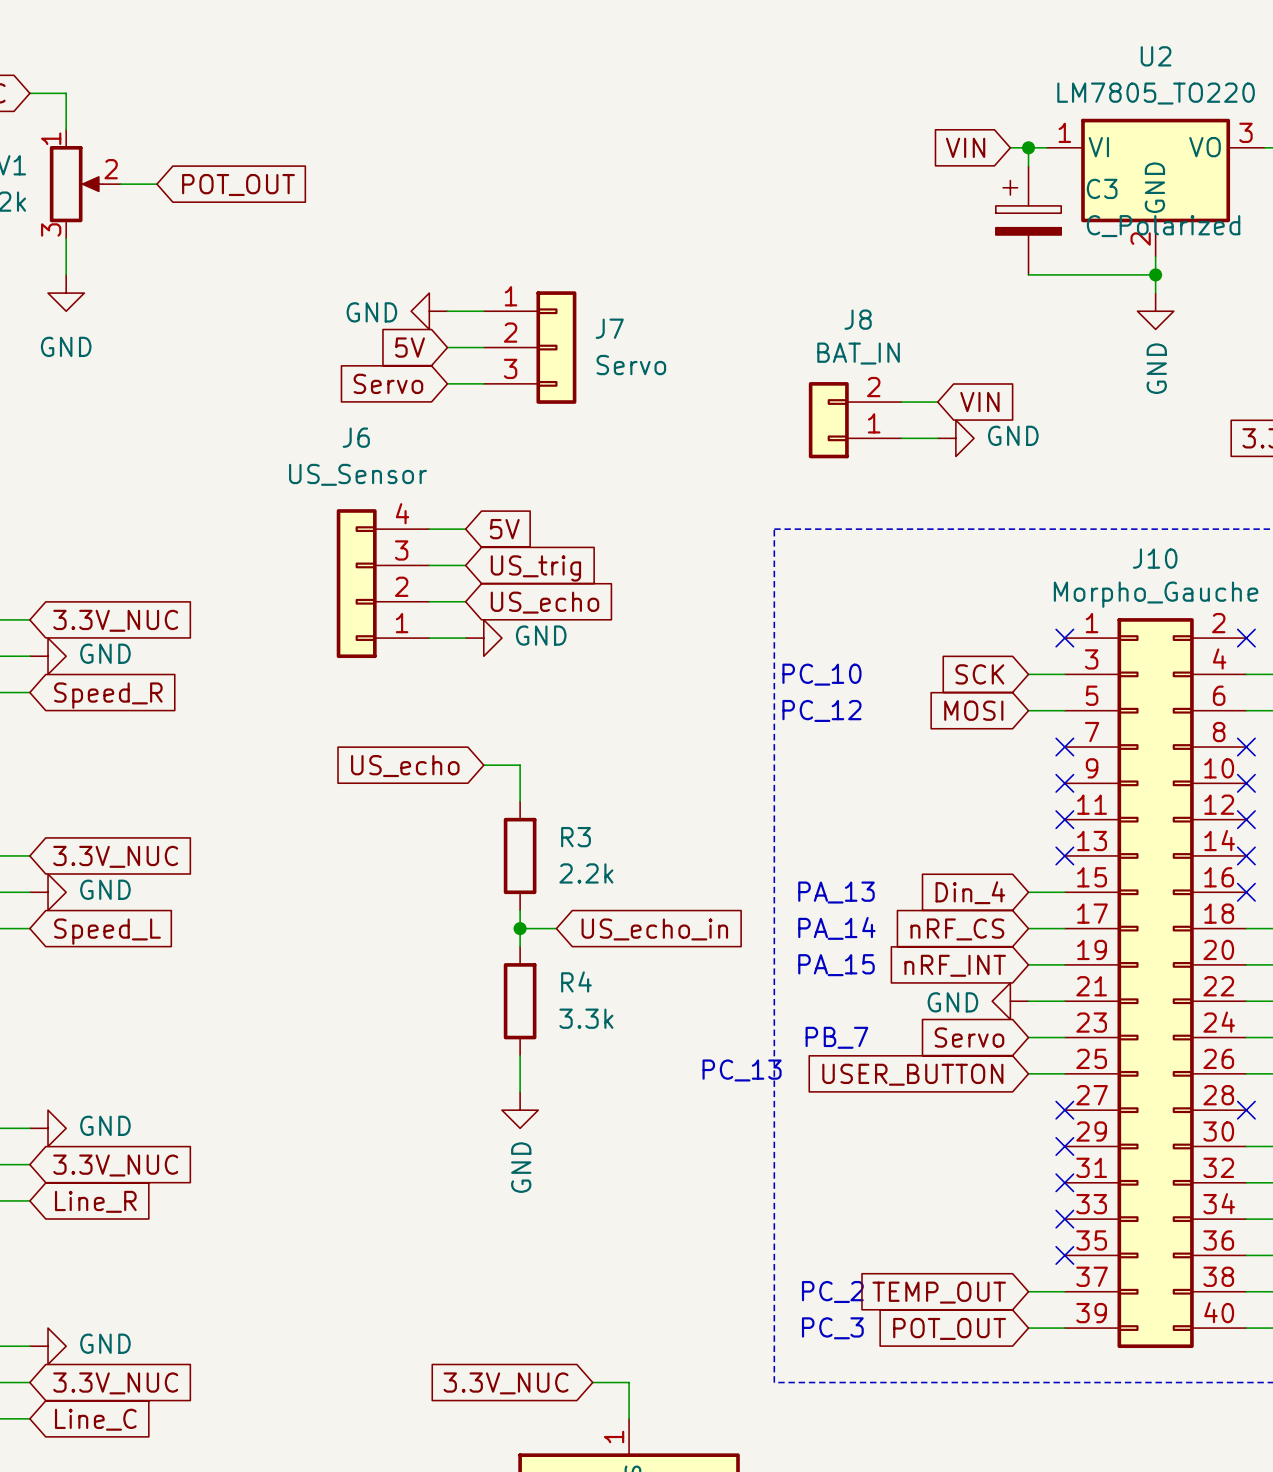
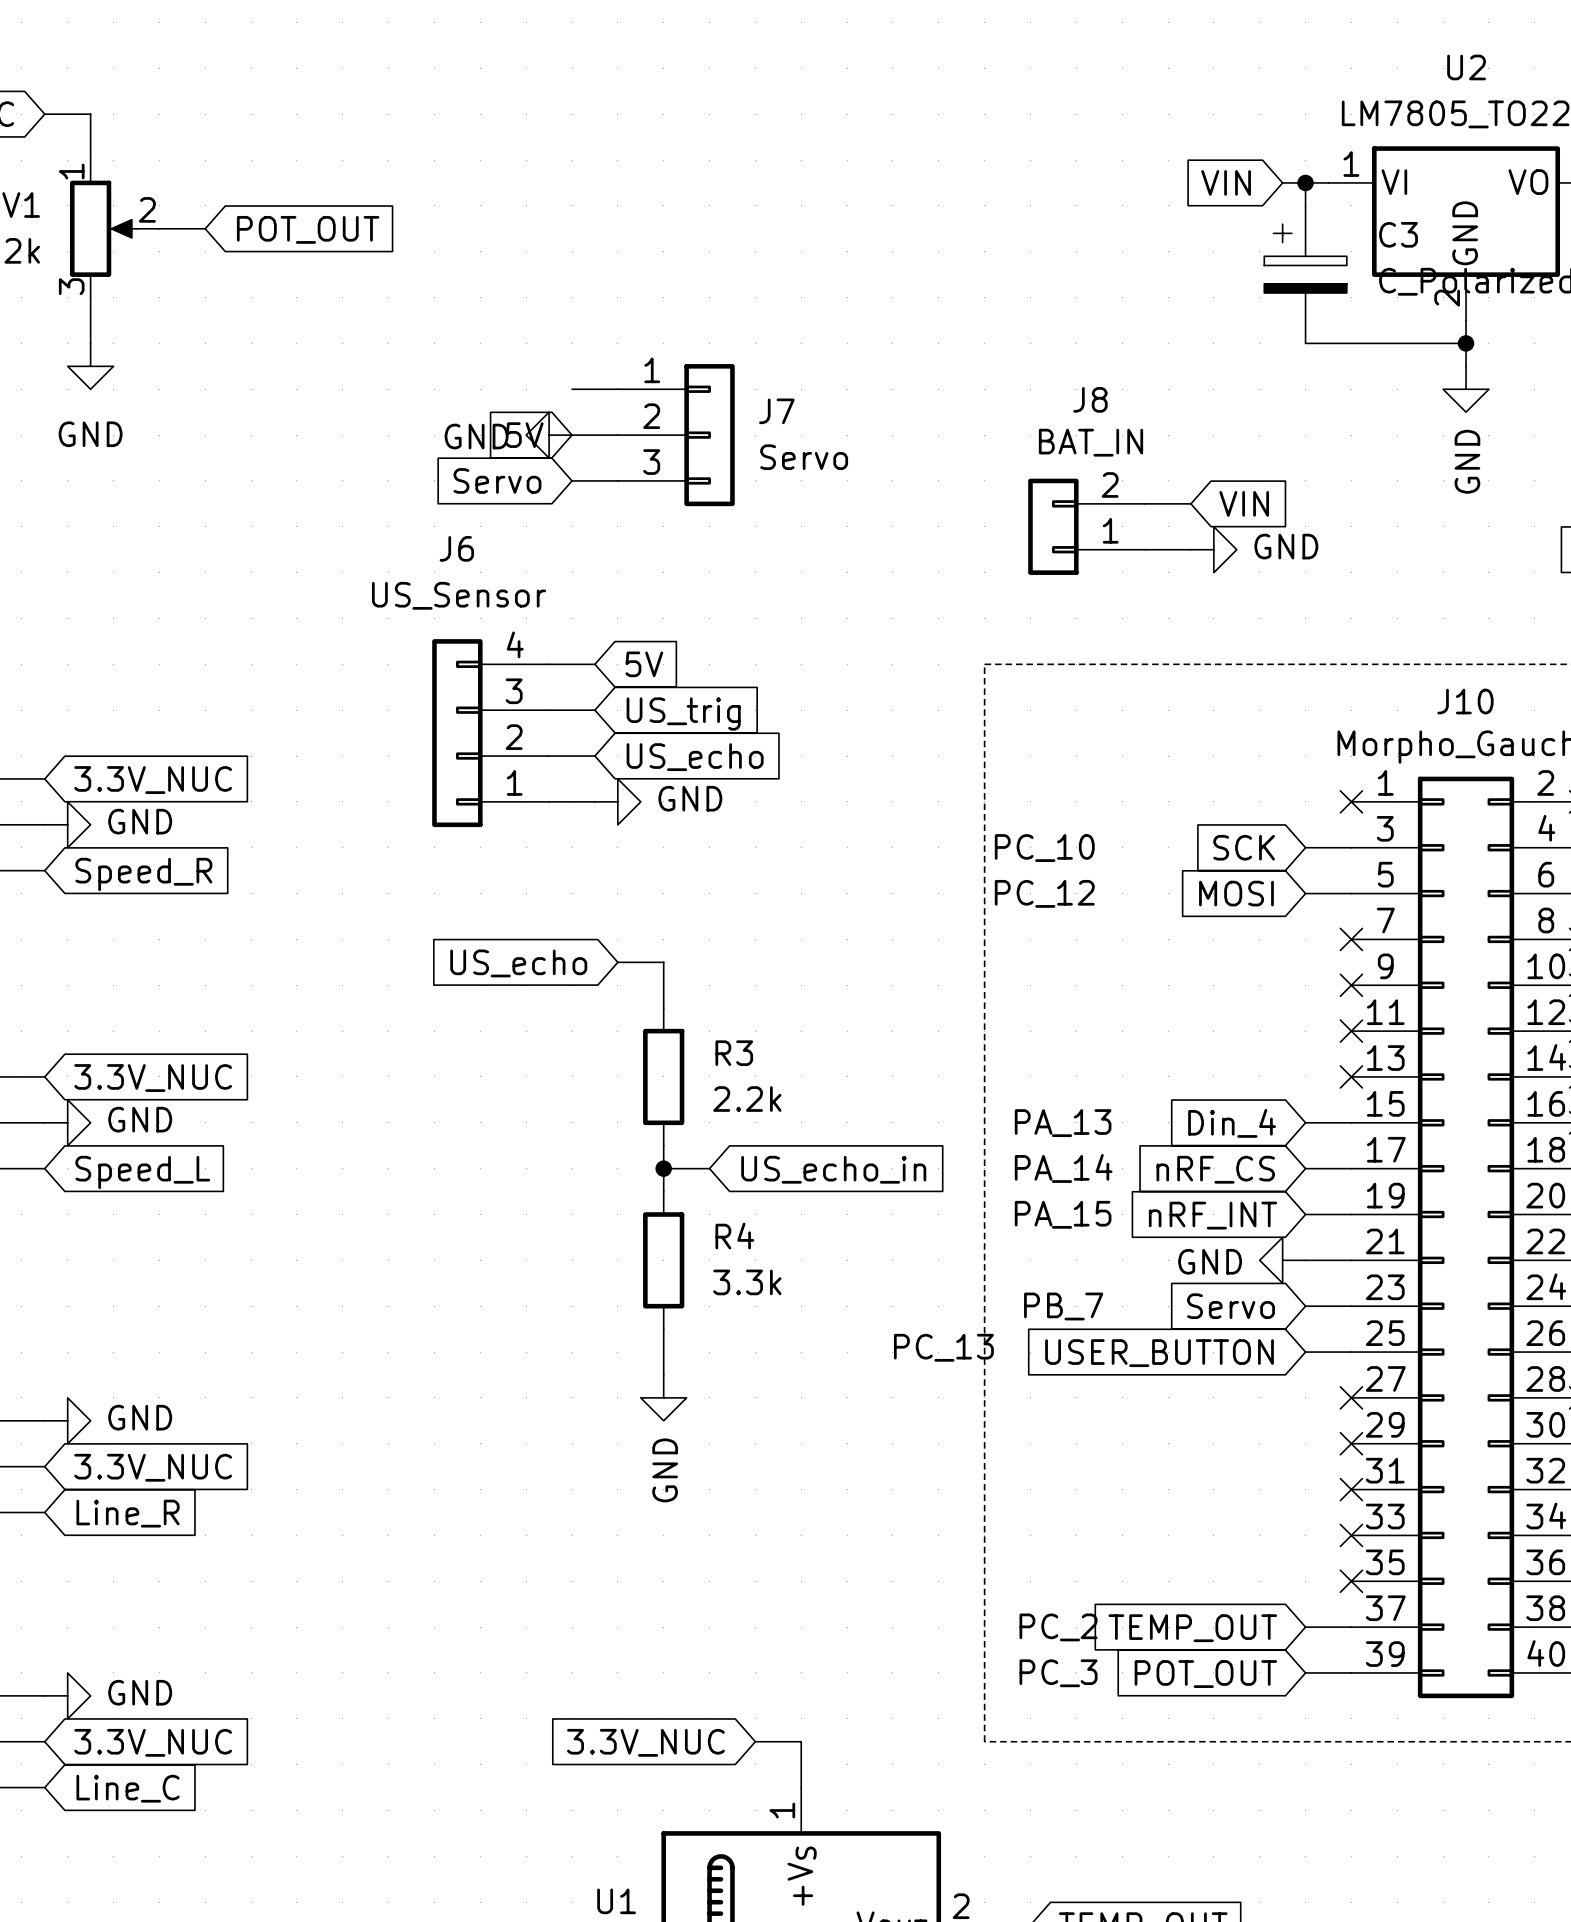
power symbol position: GND (429, 311) -> GND (549, 435)

